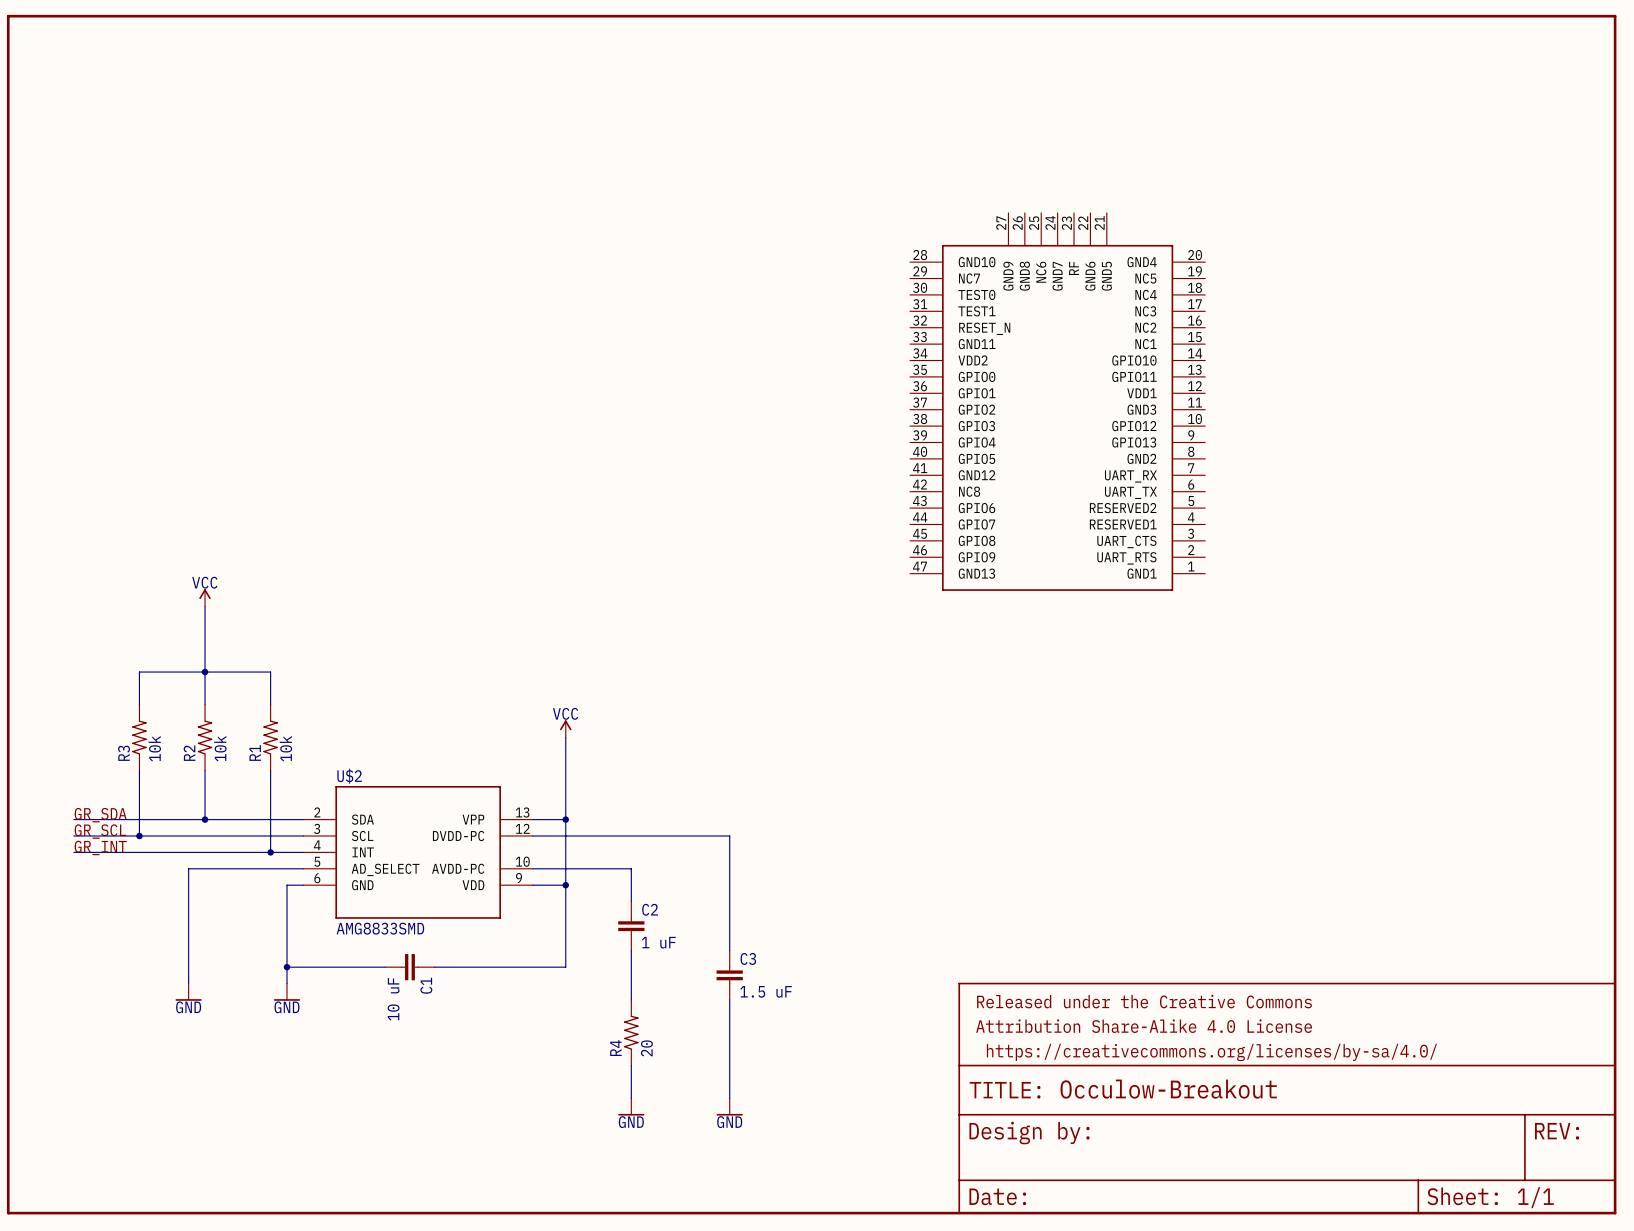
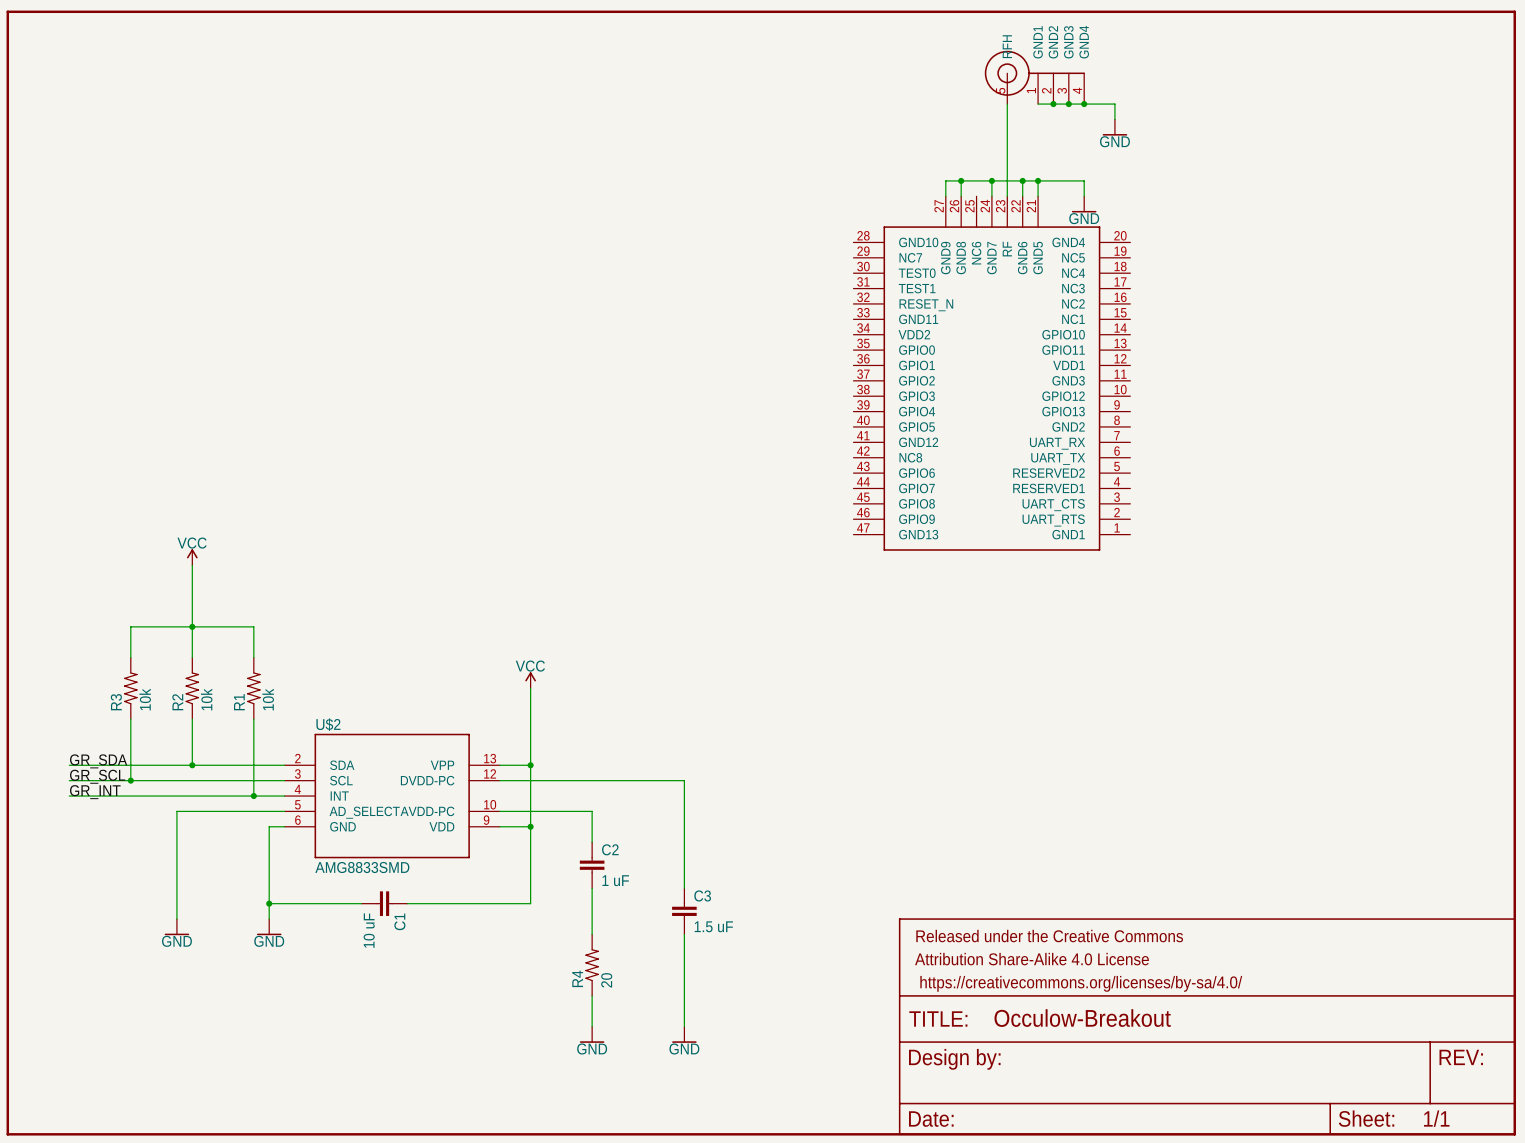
part: none -> (1034, 77)
wire: none -> (1007, 104) (1007, 196)
wire: none -> (1038, 104) (1114, 104) (1114, 119)
junction: none -> (1053, 104)
junction: none -> (1068, 104)
junction: none -> (1084, 104)
power symbol: none -> GND (1114, 127)
wire: none -> (961, 180) (961, 196)
junction: none -> (961, 180)
wire: none -> (991, 180) (991, 196)
junction: none -> (991, 180)
wire: none -> (1022, 180) (1022, 196)
junction: none -> (1022, 180)
wire: none -> (1038, 180) (1038, 196)
junction: none -> (1038, 180)
wire: none -> (945, 196) (945, 180) (1084, 180) (1084, 196)
power symbol: none -> GND (1084, 204)

